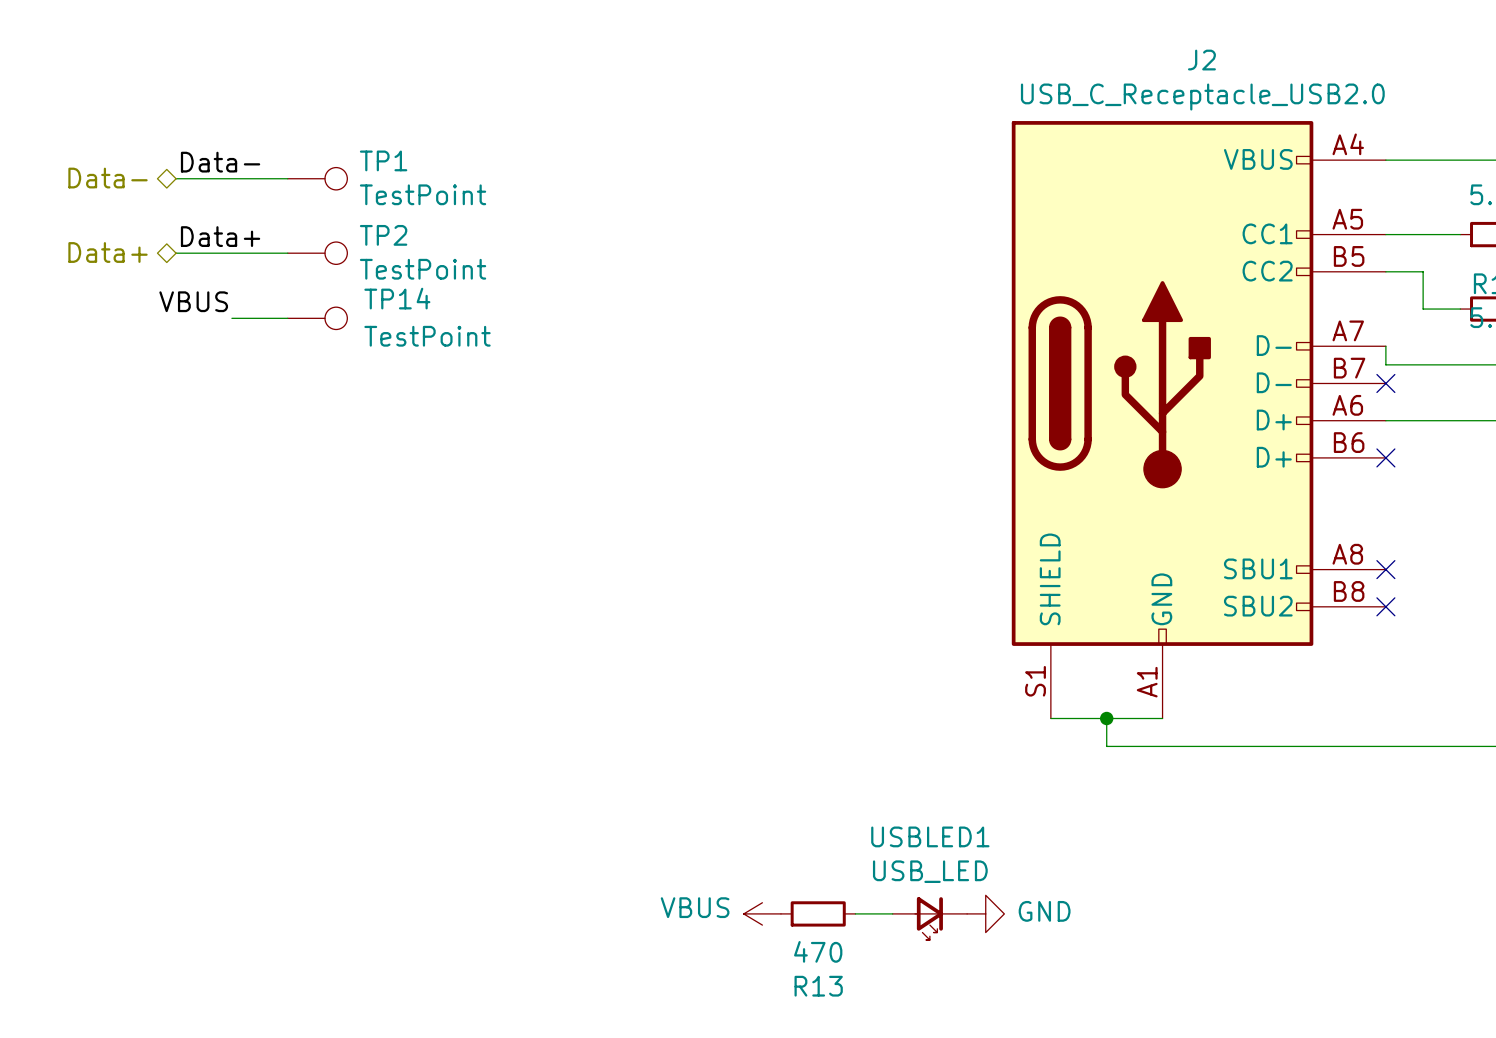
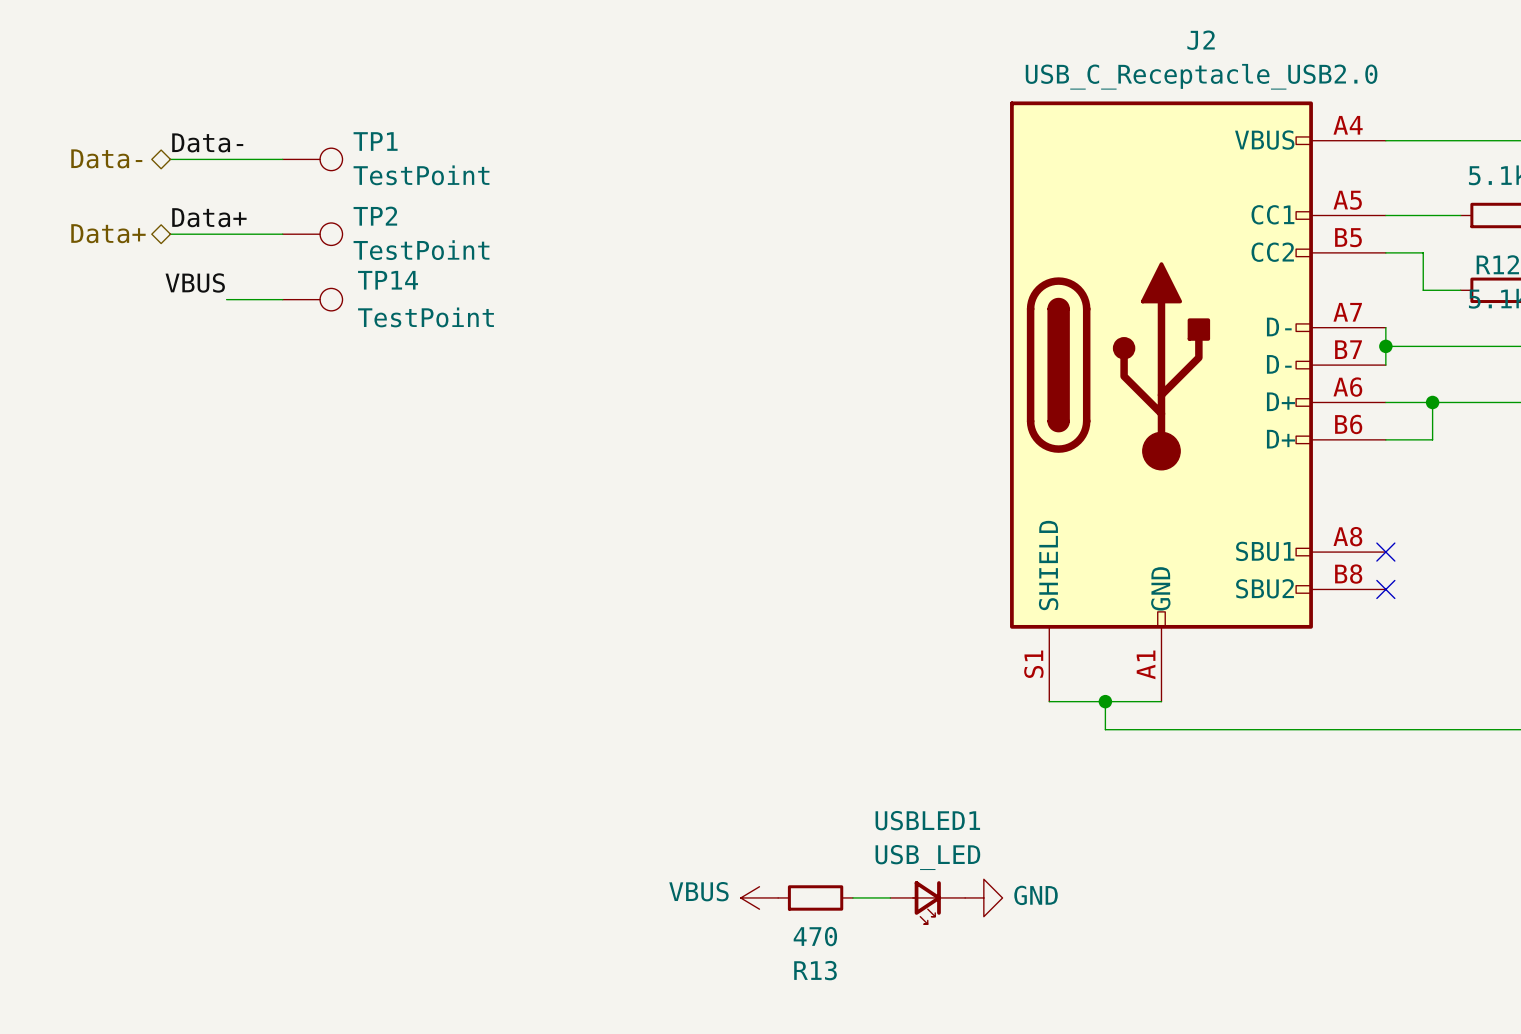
wire: none -> (1385, 346) (1385, 365)
junction: none -> (1385, 346)
no-connect mark: (1385, 383) -> none
wire: none -> (1432, 402) (1432, 439) (1385, 439)
junction: none -> (1432, 402)
no-connect mark: (1385, 457) -> none

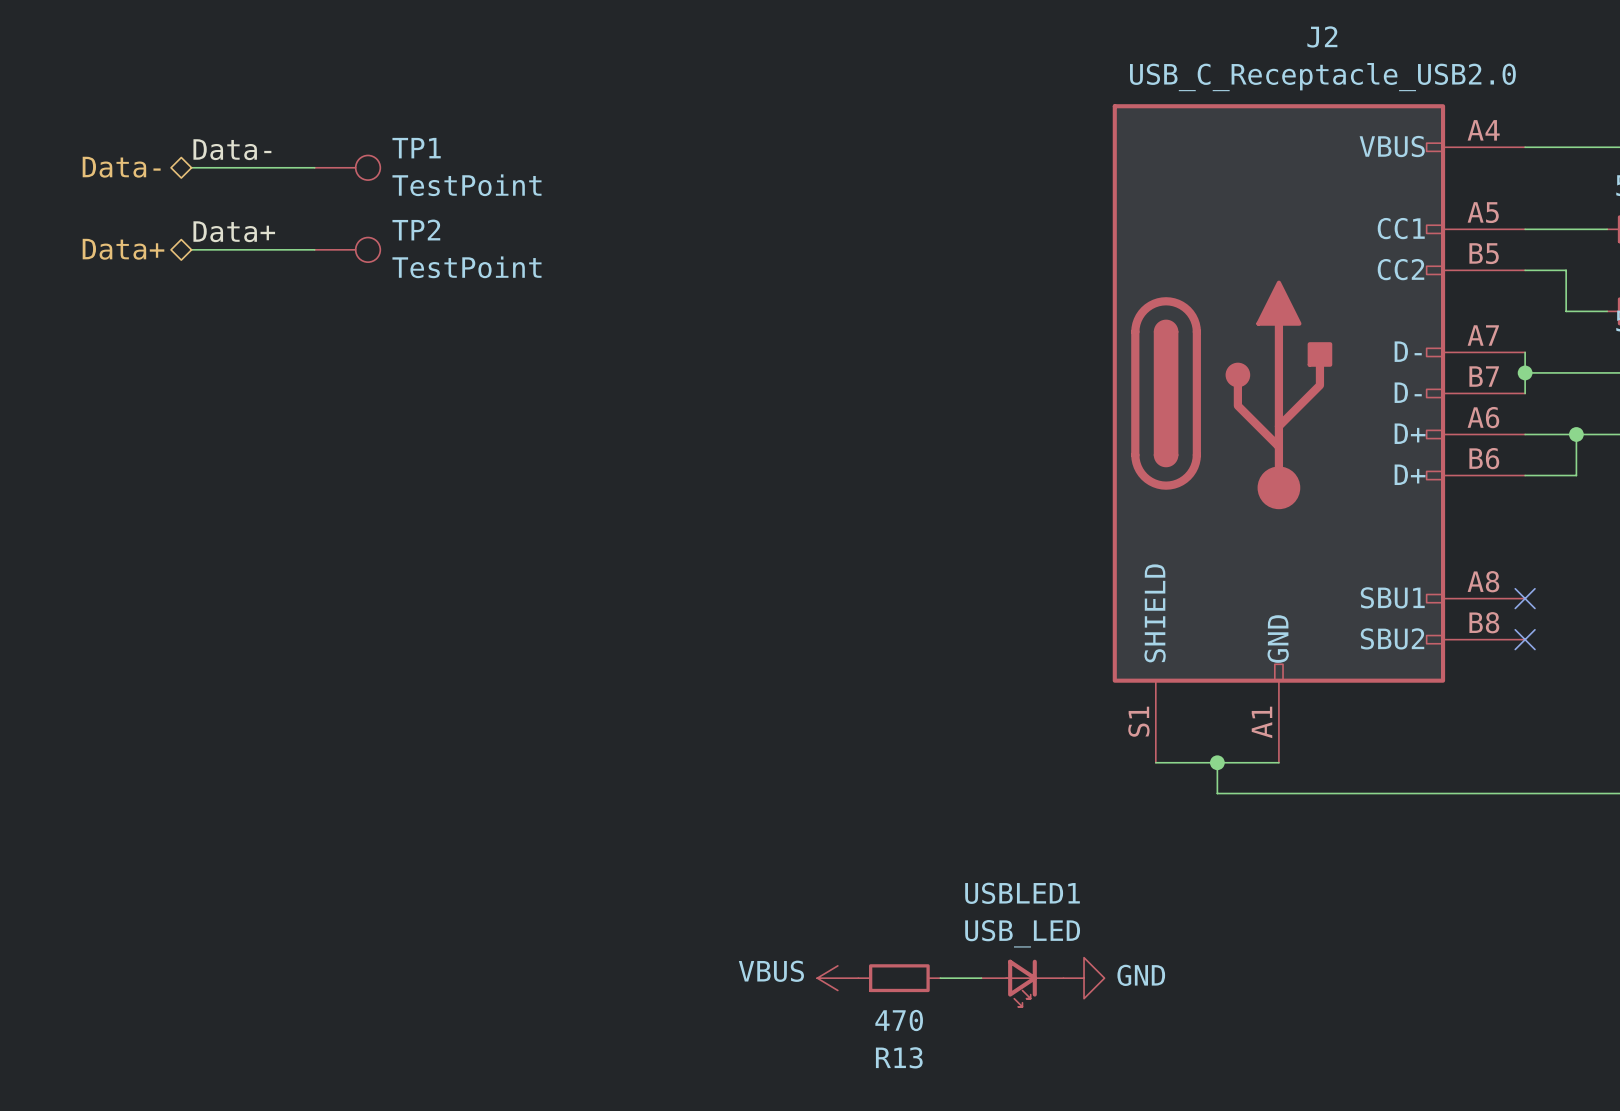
label: VBUS (195, 282) -> none
wire: (226, 299) (282, 299) -> none
TP14: TestPoint (312, 299) -> none

